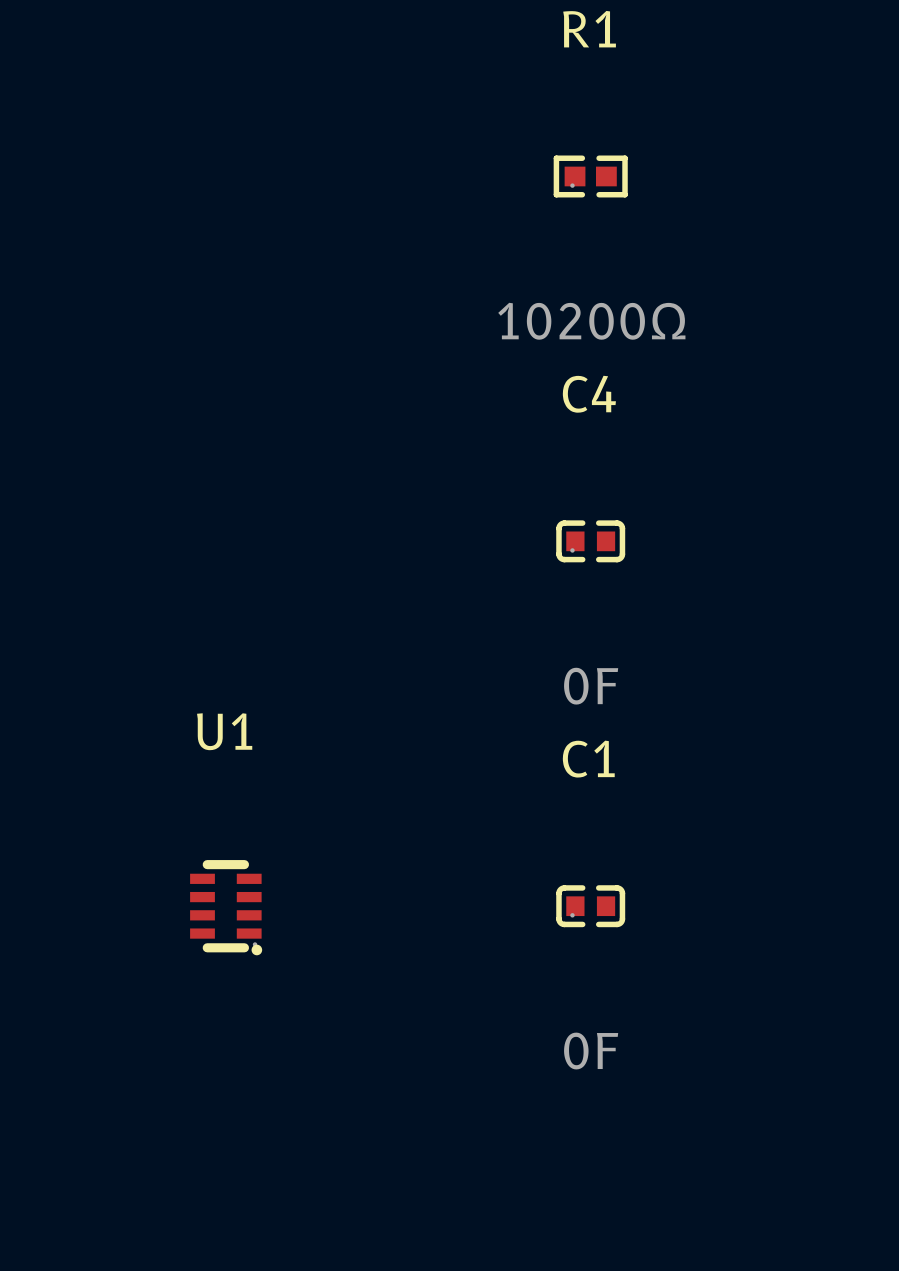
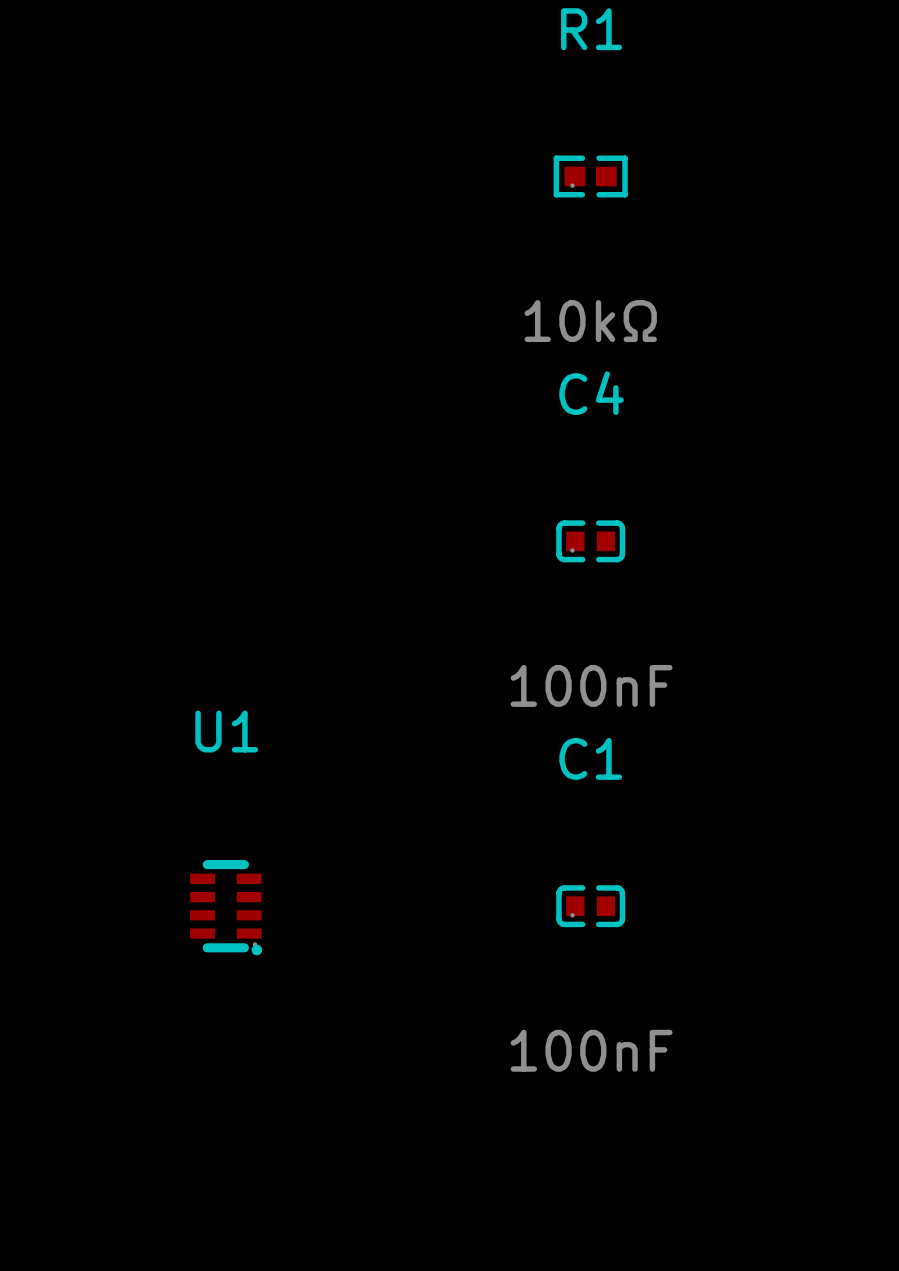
R1 value: 10200Ω (591, 321) -> 10kΩ (590, 321)
C4 value: 0F (591, 686) -> 100nF (591, 685)
C1 value: 0F (591, 1051) -> 100nF (591, 1050)

